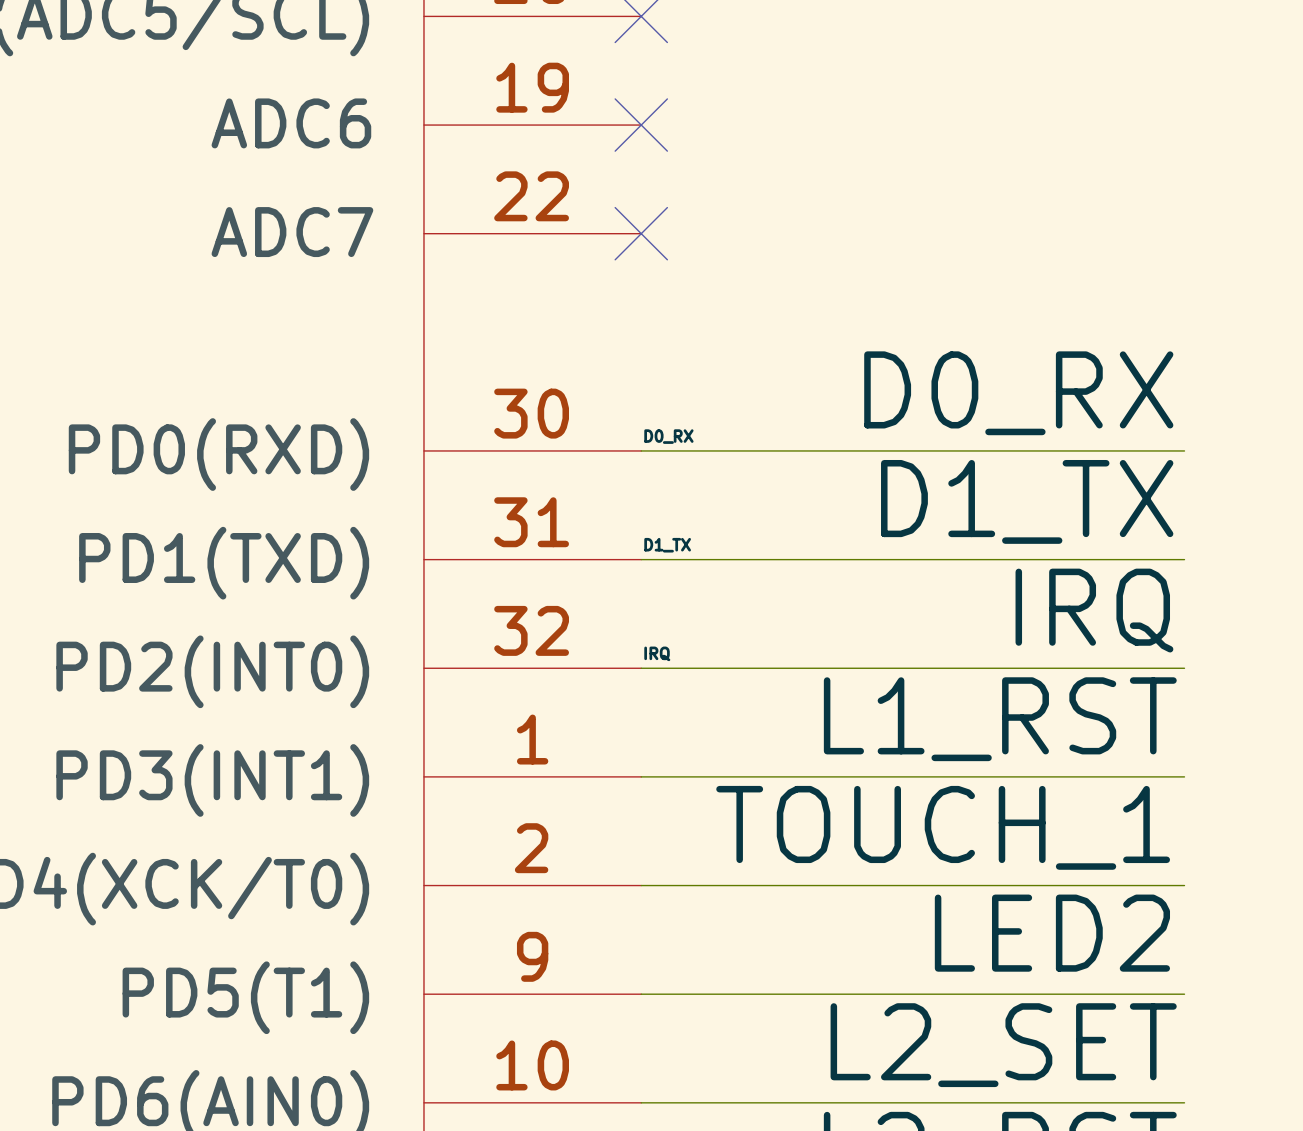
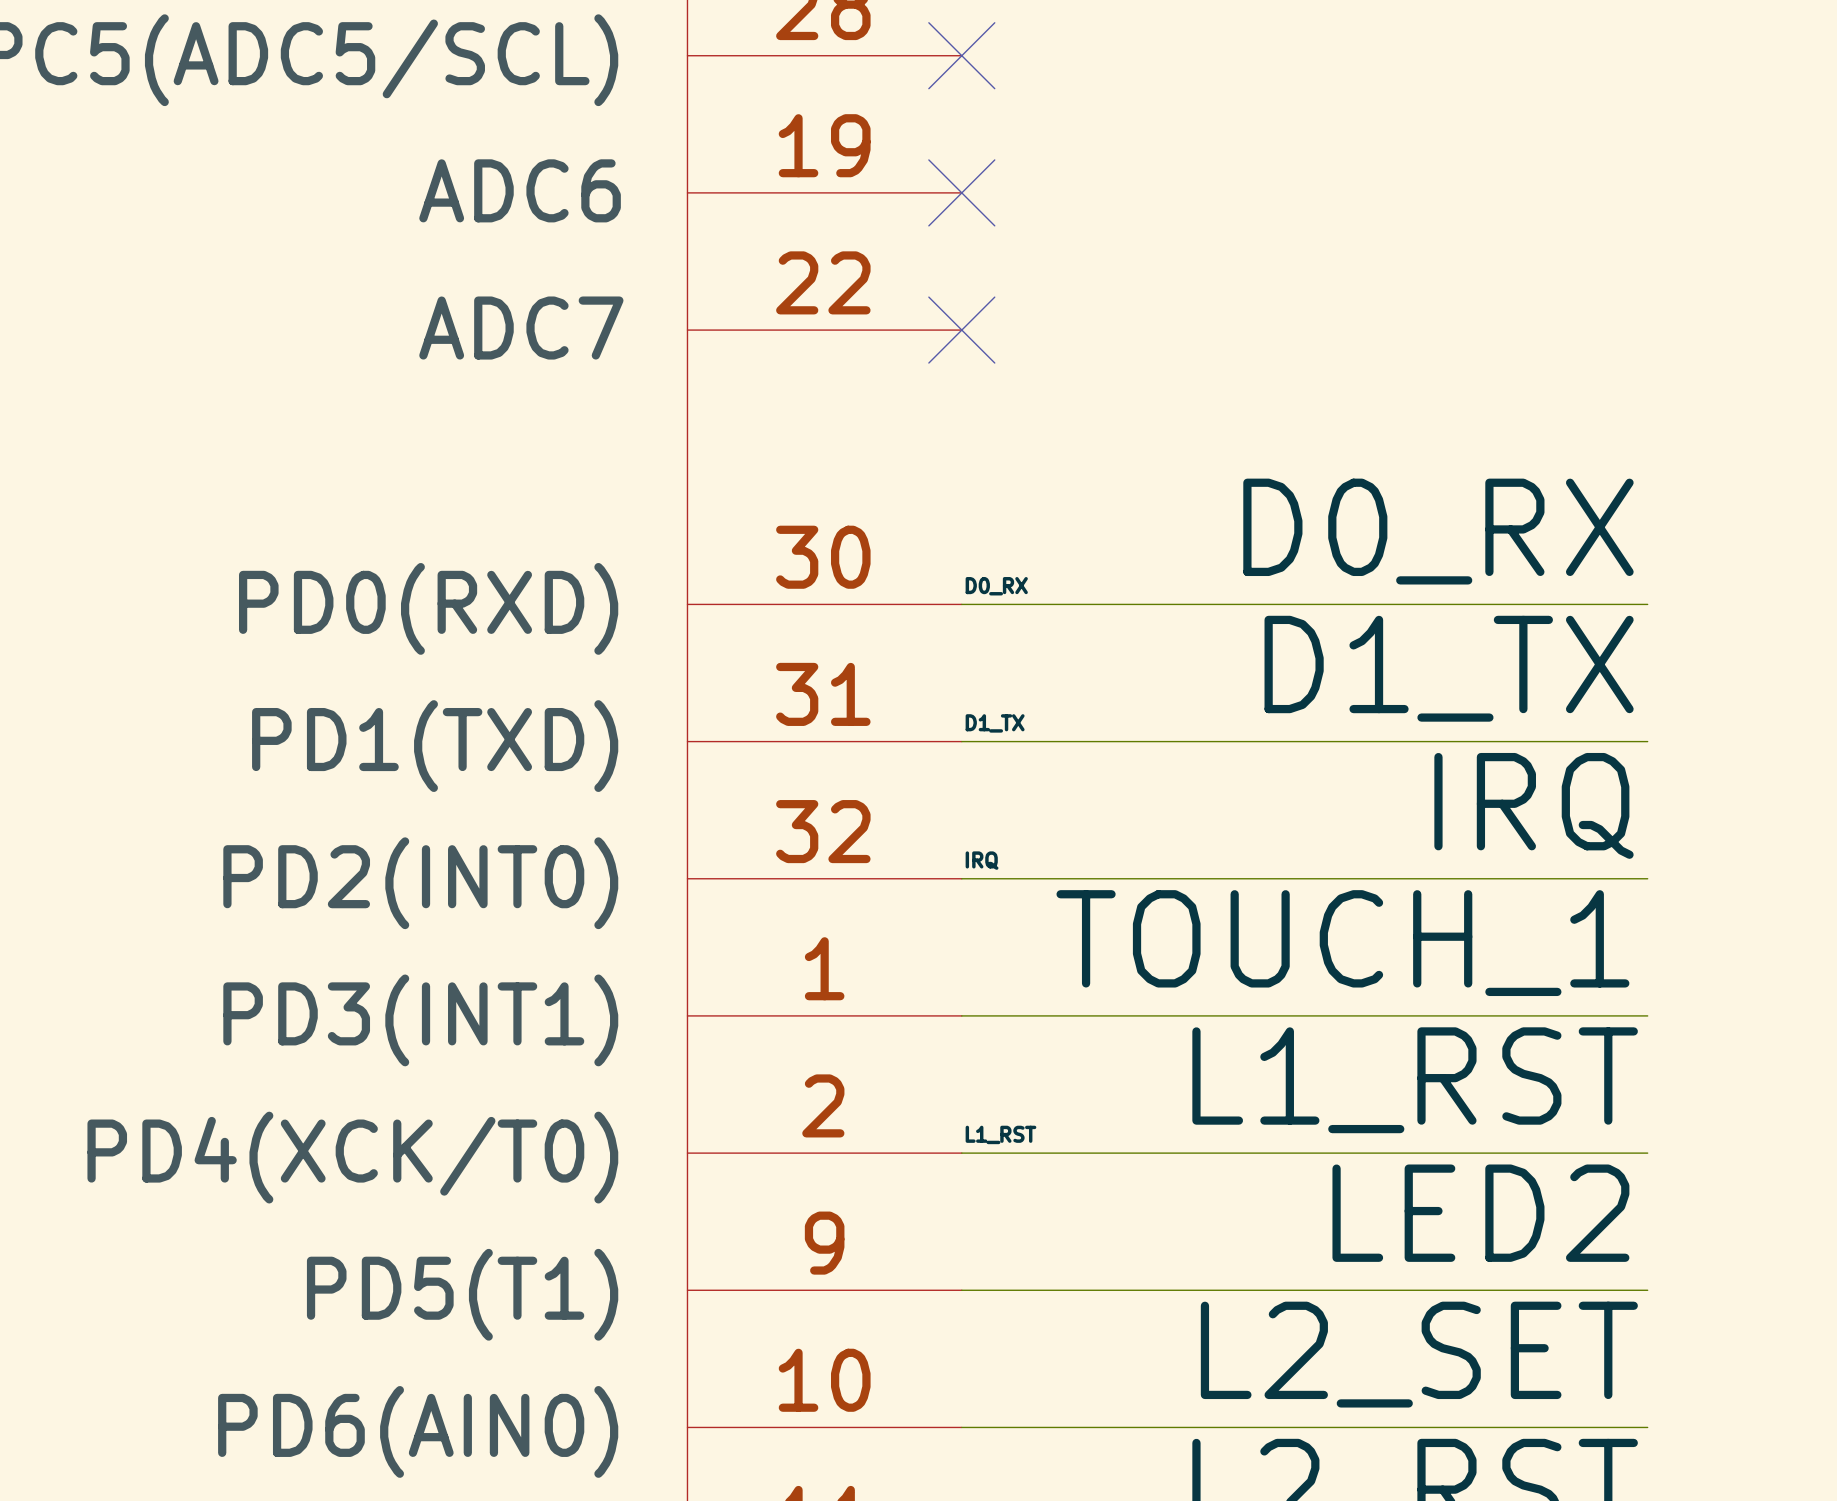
label: L1_RST (1000, 719) -> TOUCH_1 (1342, 943)
label: TOUCH_1 (943, 827) -> L1_RST (1415, 1080)
label: none -> L1_RST (1000, 1134)

